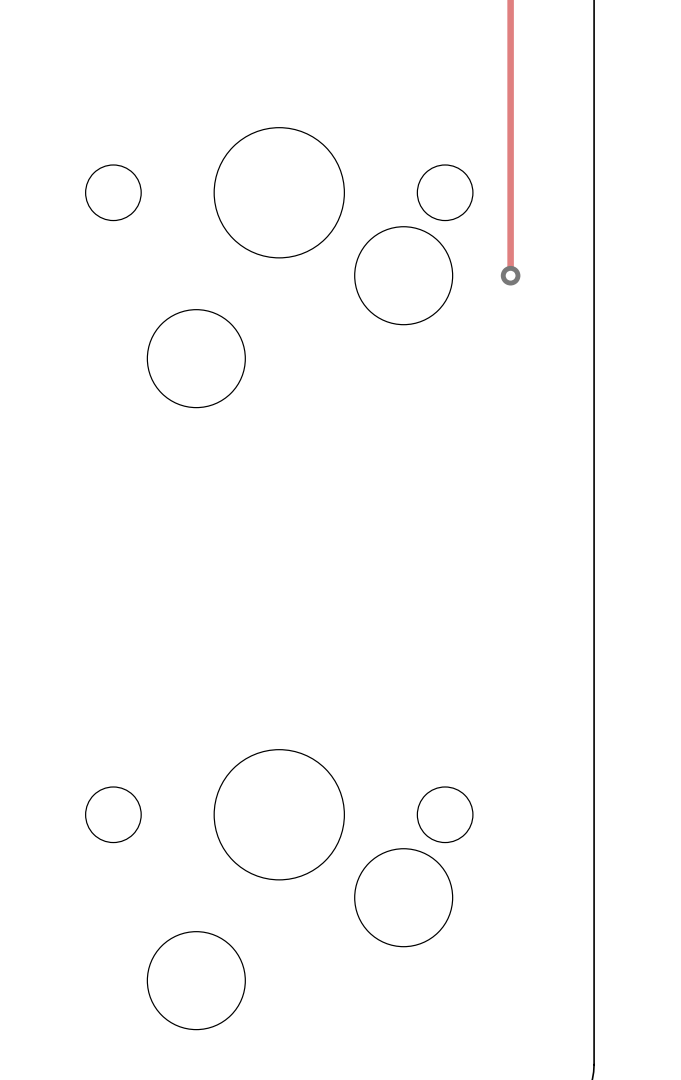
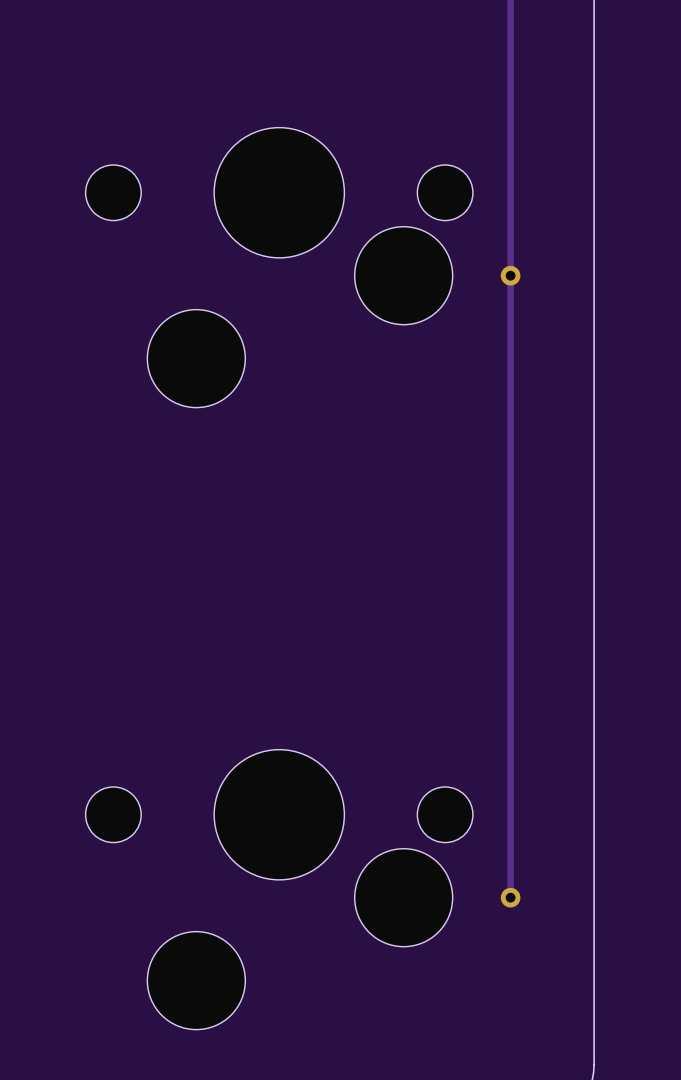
track: none -> (510, 275) (510, 897)
via: none -> (510, 897)

